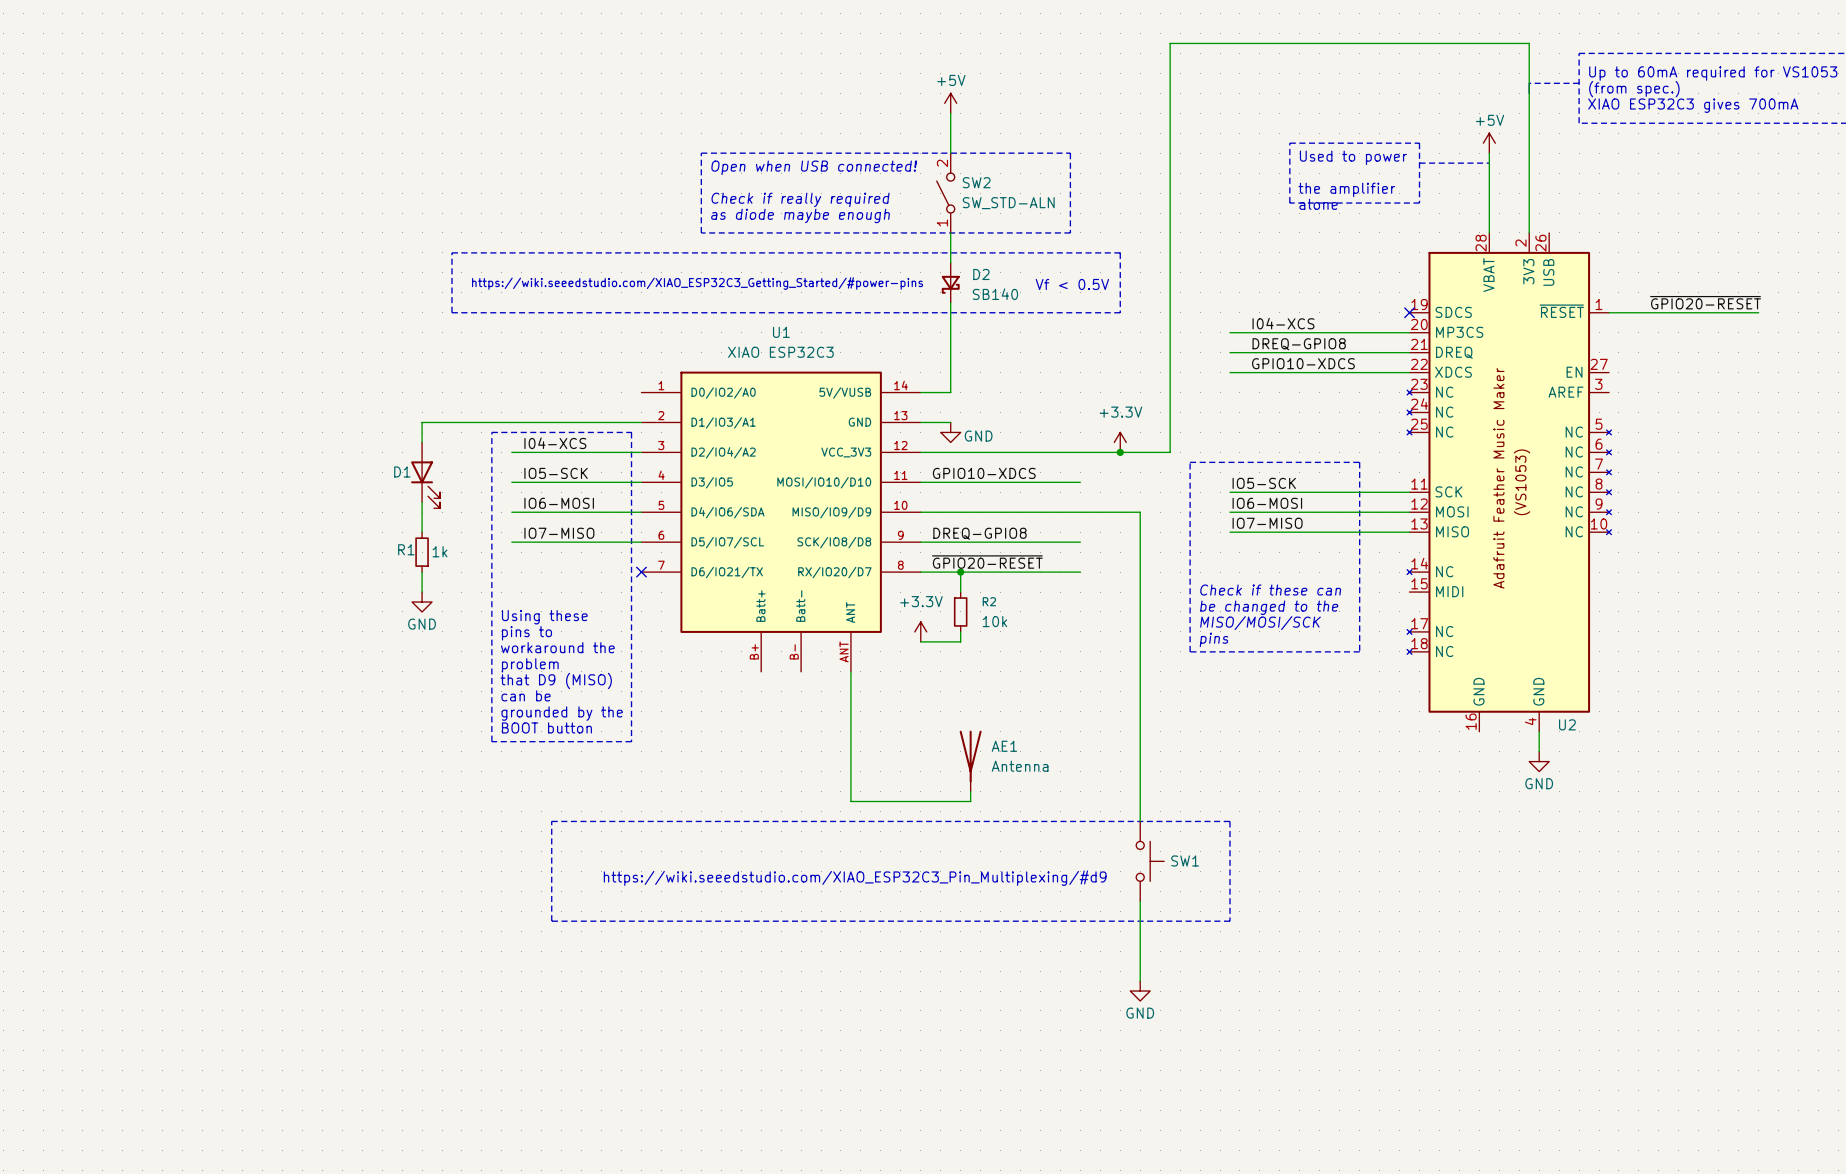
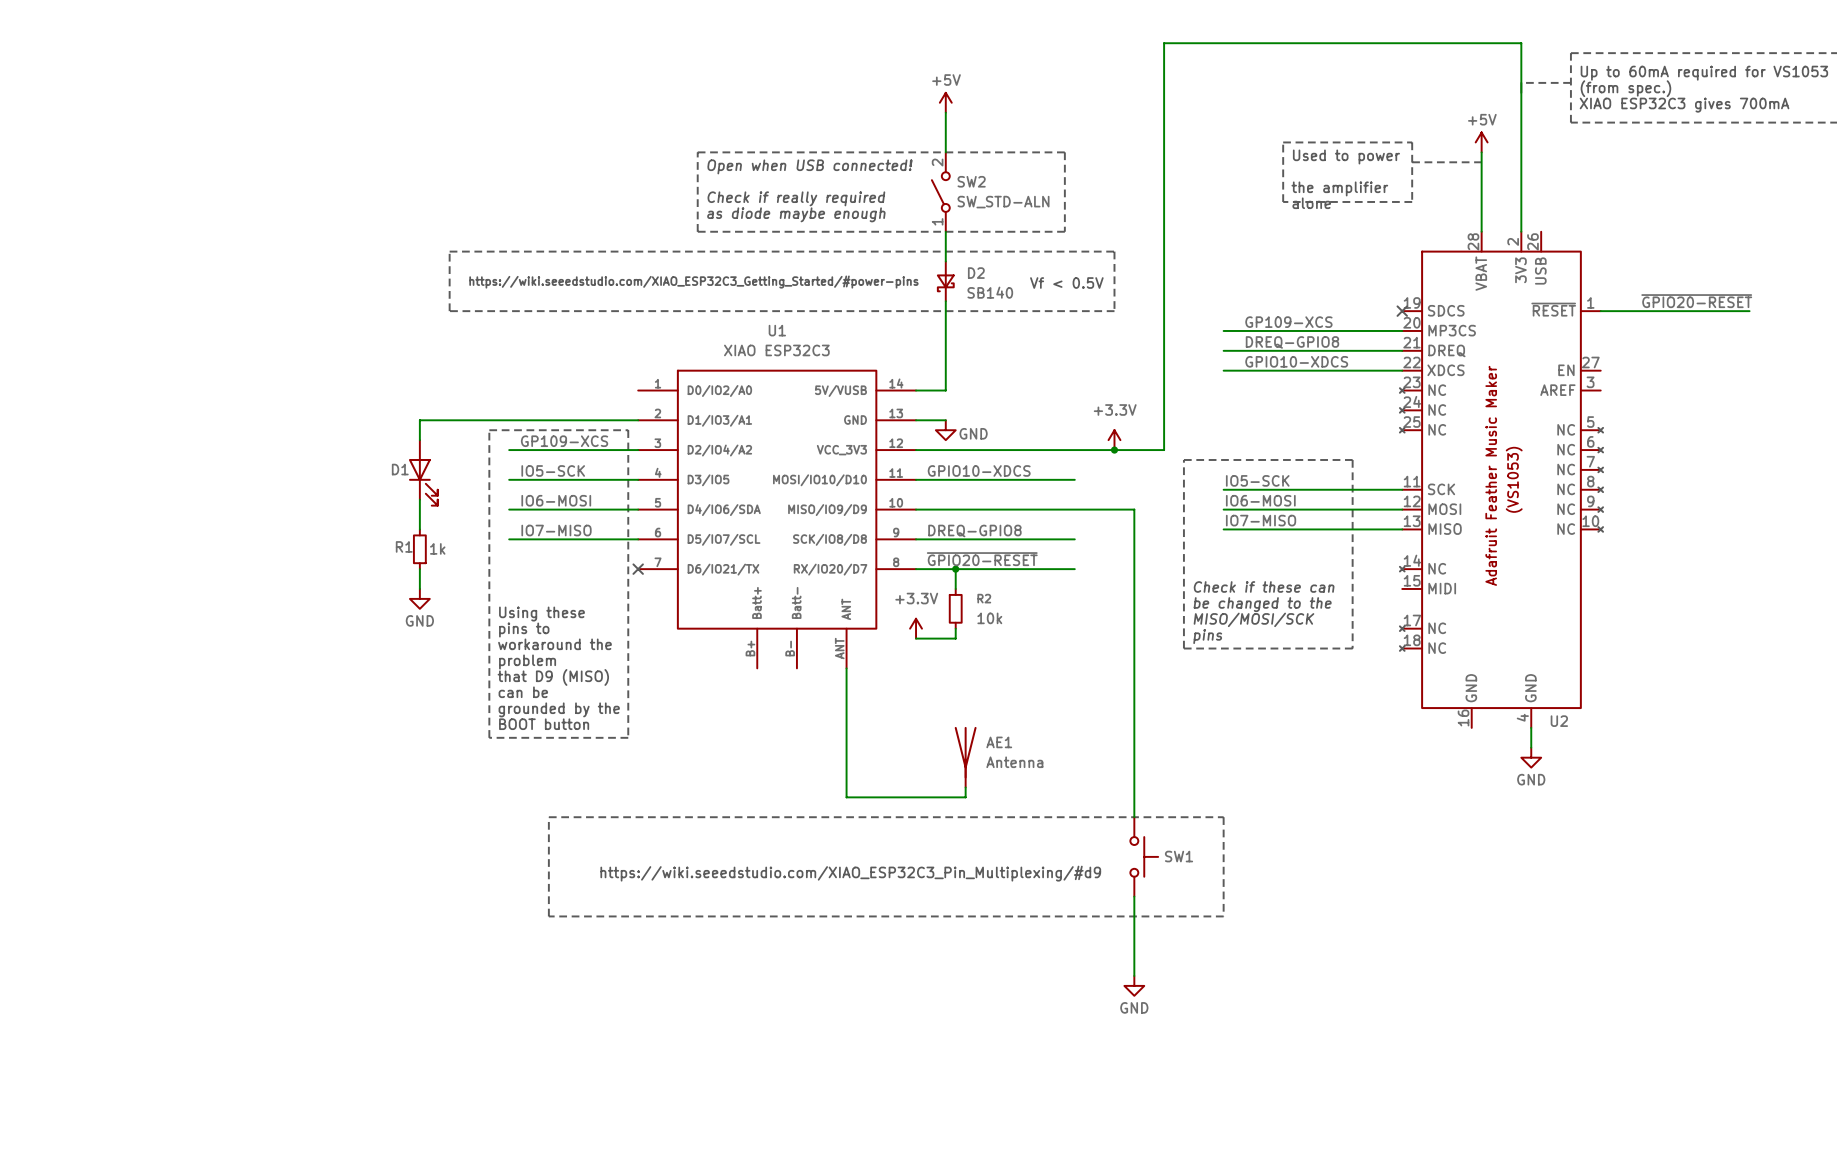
label: I04-XCS (1283, 323) -> GP109-XCS (1288, 322)
label: I04-XCS (555, 443) -> GP109-XCS (564, 441)

